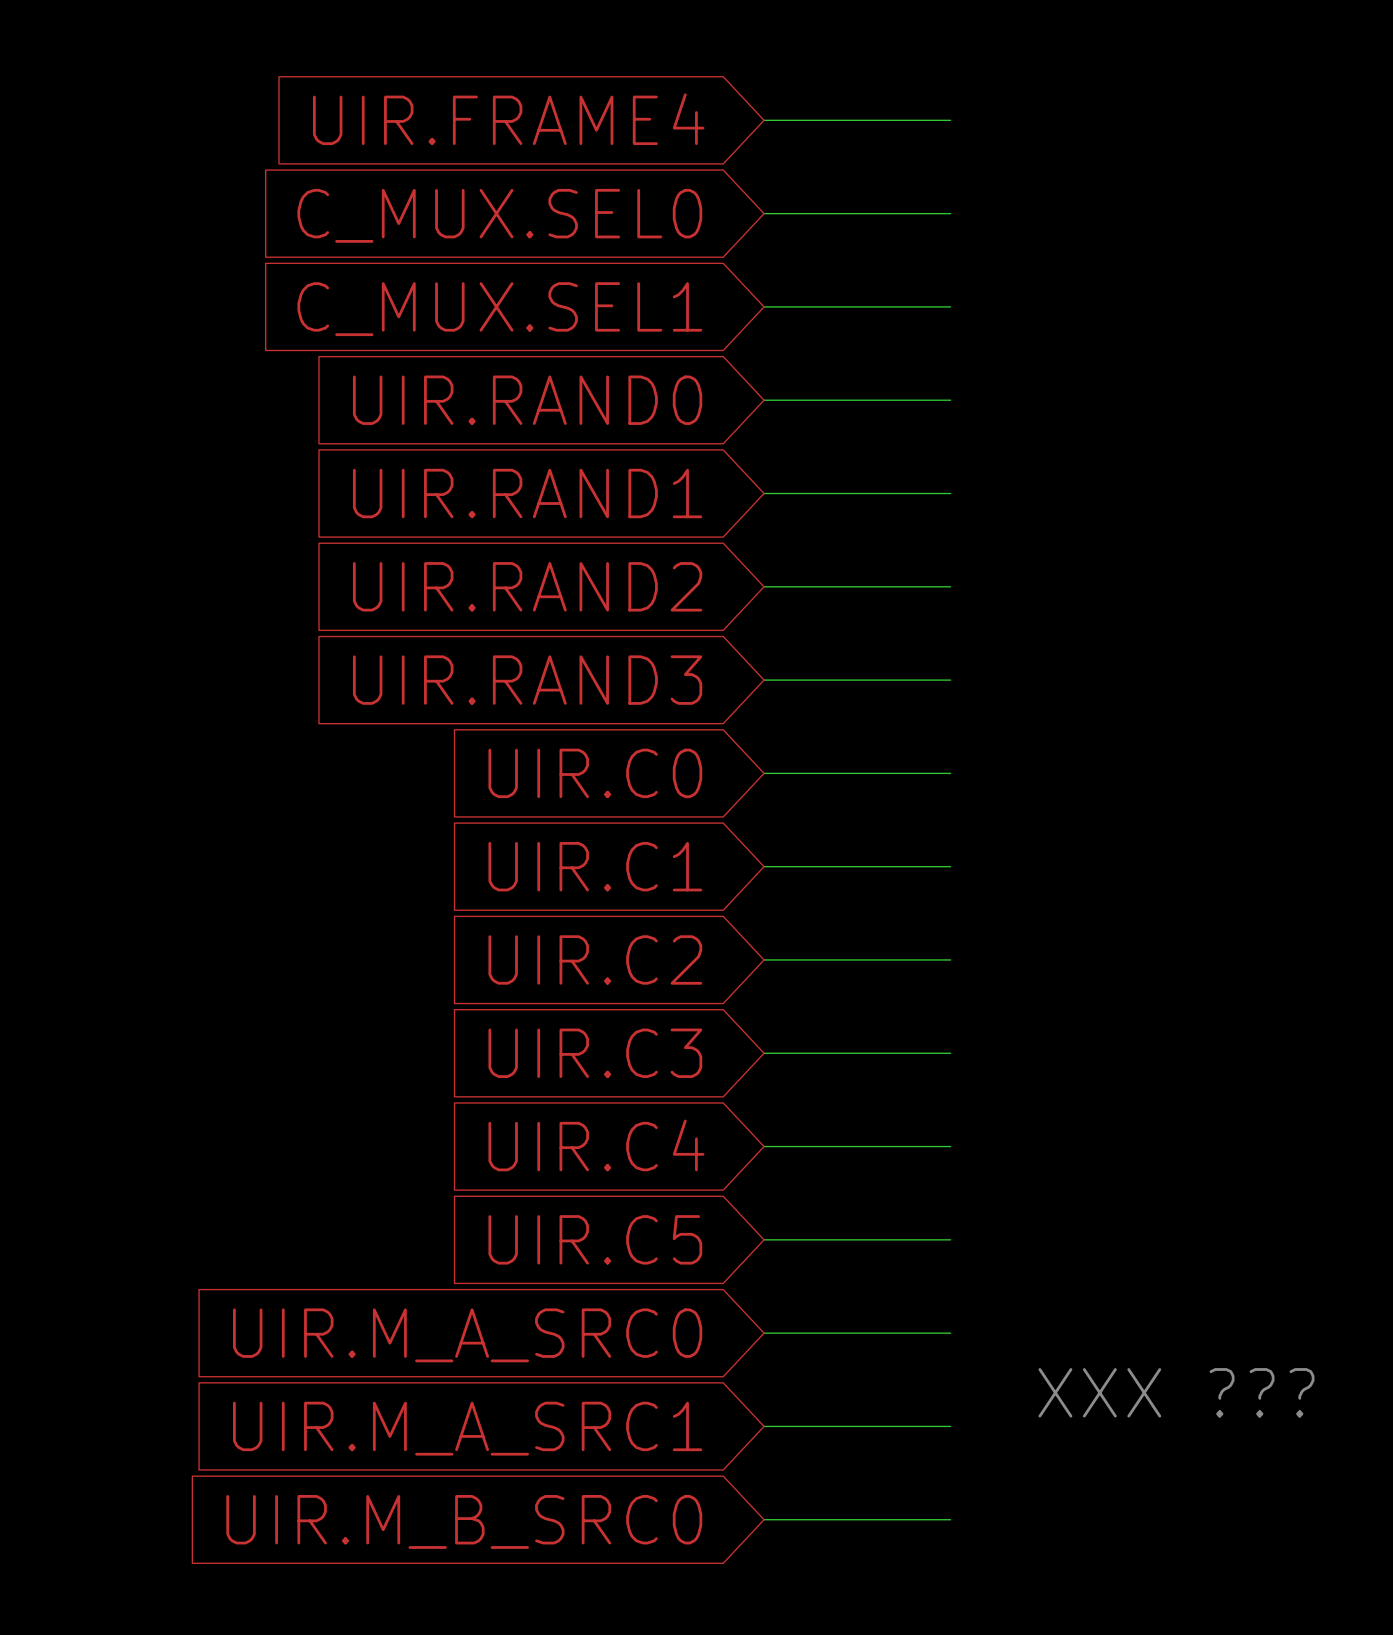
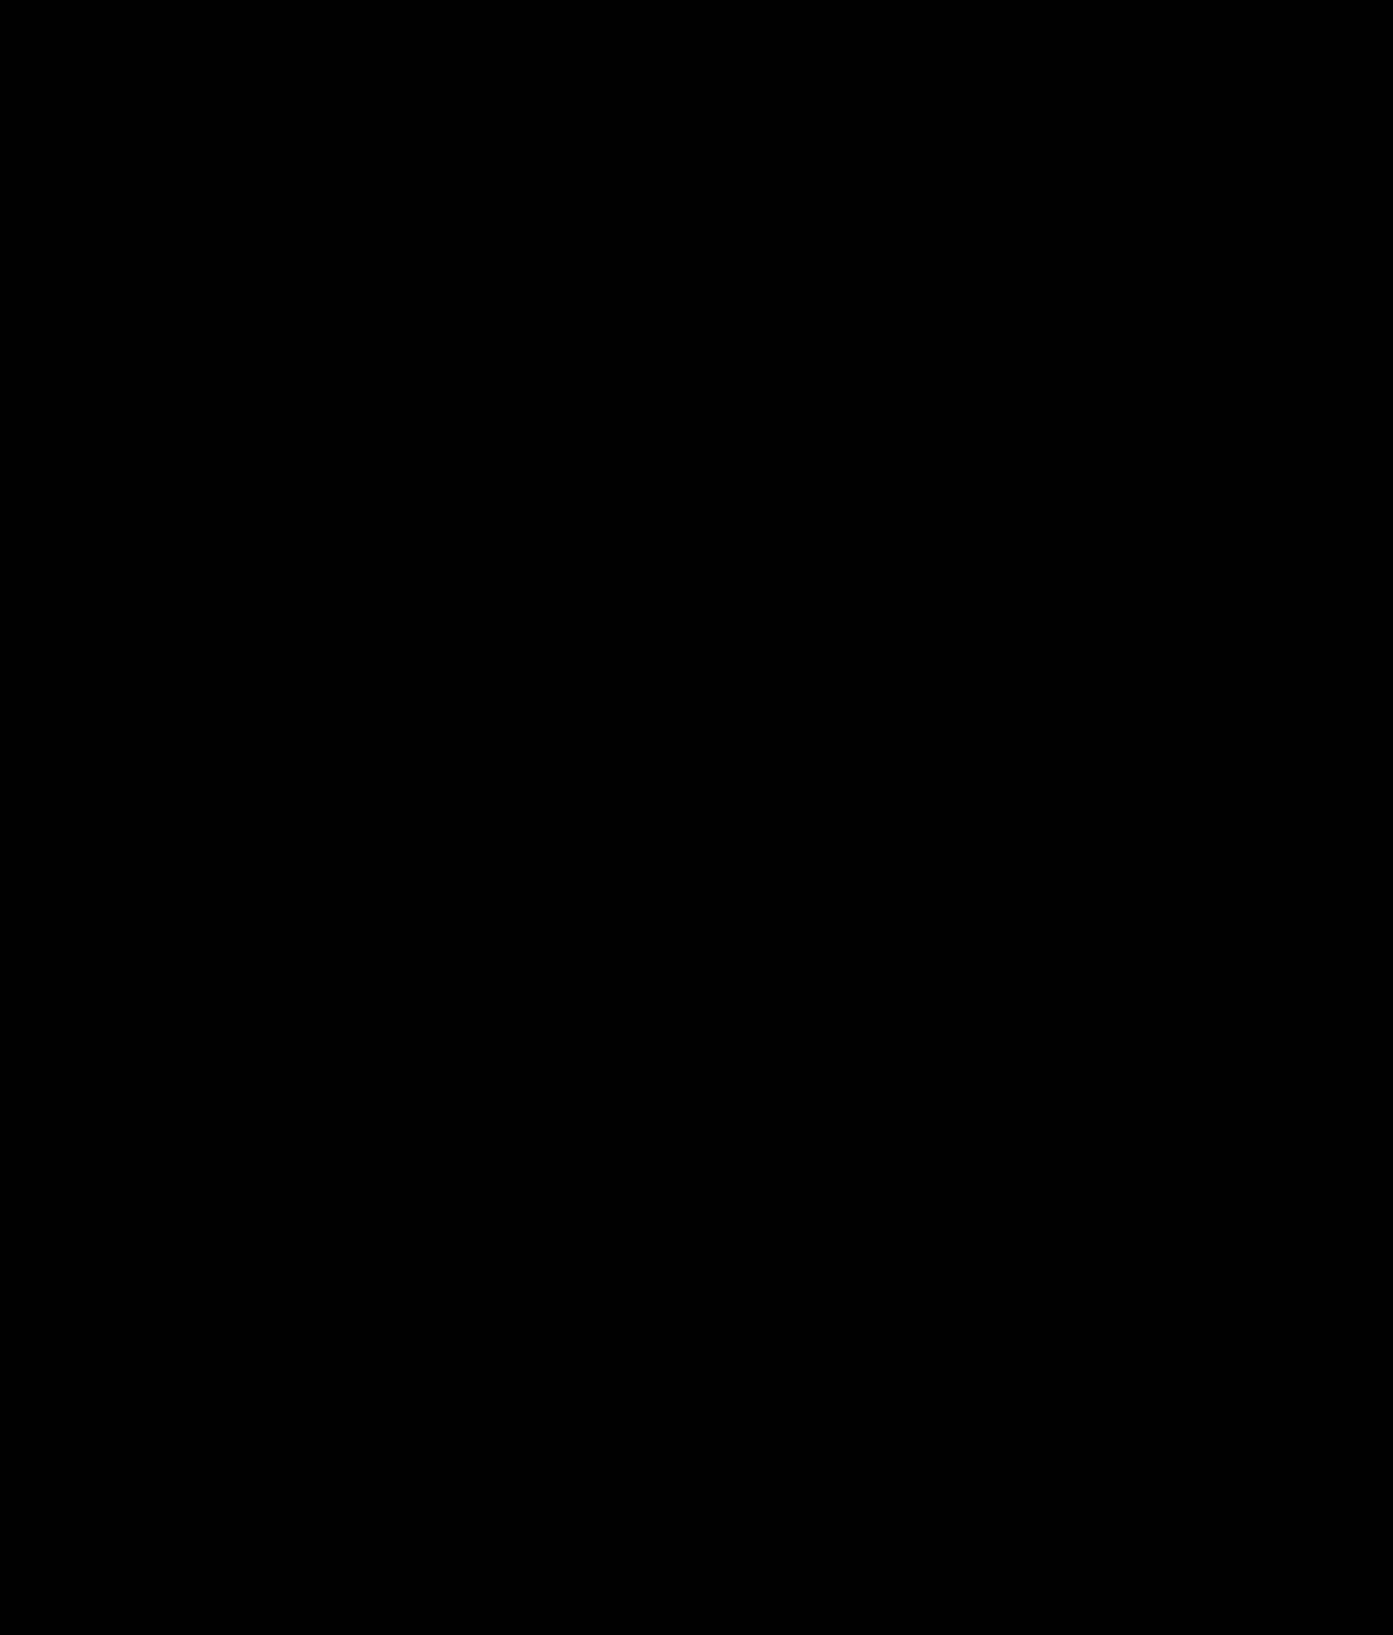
global label: UIR.FRAME4 (508, 119) -> none
wire: (764, 120) (950, 120) -> none
wire: (764, 213) (950, 213) -> none
global label: C_MUX.SEL0 (499, 215) -> none
wire: (764, 306) (950, 306) -> none
global label: C_MUX.SEL1 (499, 309) -> none
global label: UIR.RAND0 (527, 400) -> none
wire: (764, 400) (950, 400) -> none
global label: UIR.RAND1 (527, 493) -> none
wire: (764, 493) (950, 493) -> none
global label: UIR.RAND2 (527, 586) -> none
wire: (764, 586) (950, 586) -> none
global label: UIR.RAND3 (527, 680) -> none
wire: (764, 680) (950, 680) -> none
global label: UIR.C0 (595, 773) -> none
wire: (764, 773) (950, 773) -> none
global label: UIR.C1 (595, 866) -> none
wire: (764, 866) (950, 866) -> none
global label: UIR.C2 (595, 959) -> none
wire: (764, 959) (950, 959) -> none
global label: UIR.C3 (595, 1053) -> none
wire: (764, 1053) (950, 1053) -> none
global label: UIR.C4 (596, 1145) -> none
wire: (764, 1146) (950, 1146) -> none
global label: UIR.C5 (595, 1239) -> none
wire: (764, 1239) (950, 1239) -> none
wire: (764, 1333) (950, 1333) -> none
global label: UIR.M_A_SRC0 (467, 1335) -> none
text: XXX ??? (1176, 1392) -> none
wire: (764, 1426) (950, 1426) -> none
global label: UIR.M_A_SRC1 (467, 1428) -> none
wire: (764, 1519) (950, 1519) -> none
global label: UIR.M_B_SRC0 (464, 1521) -> none

